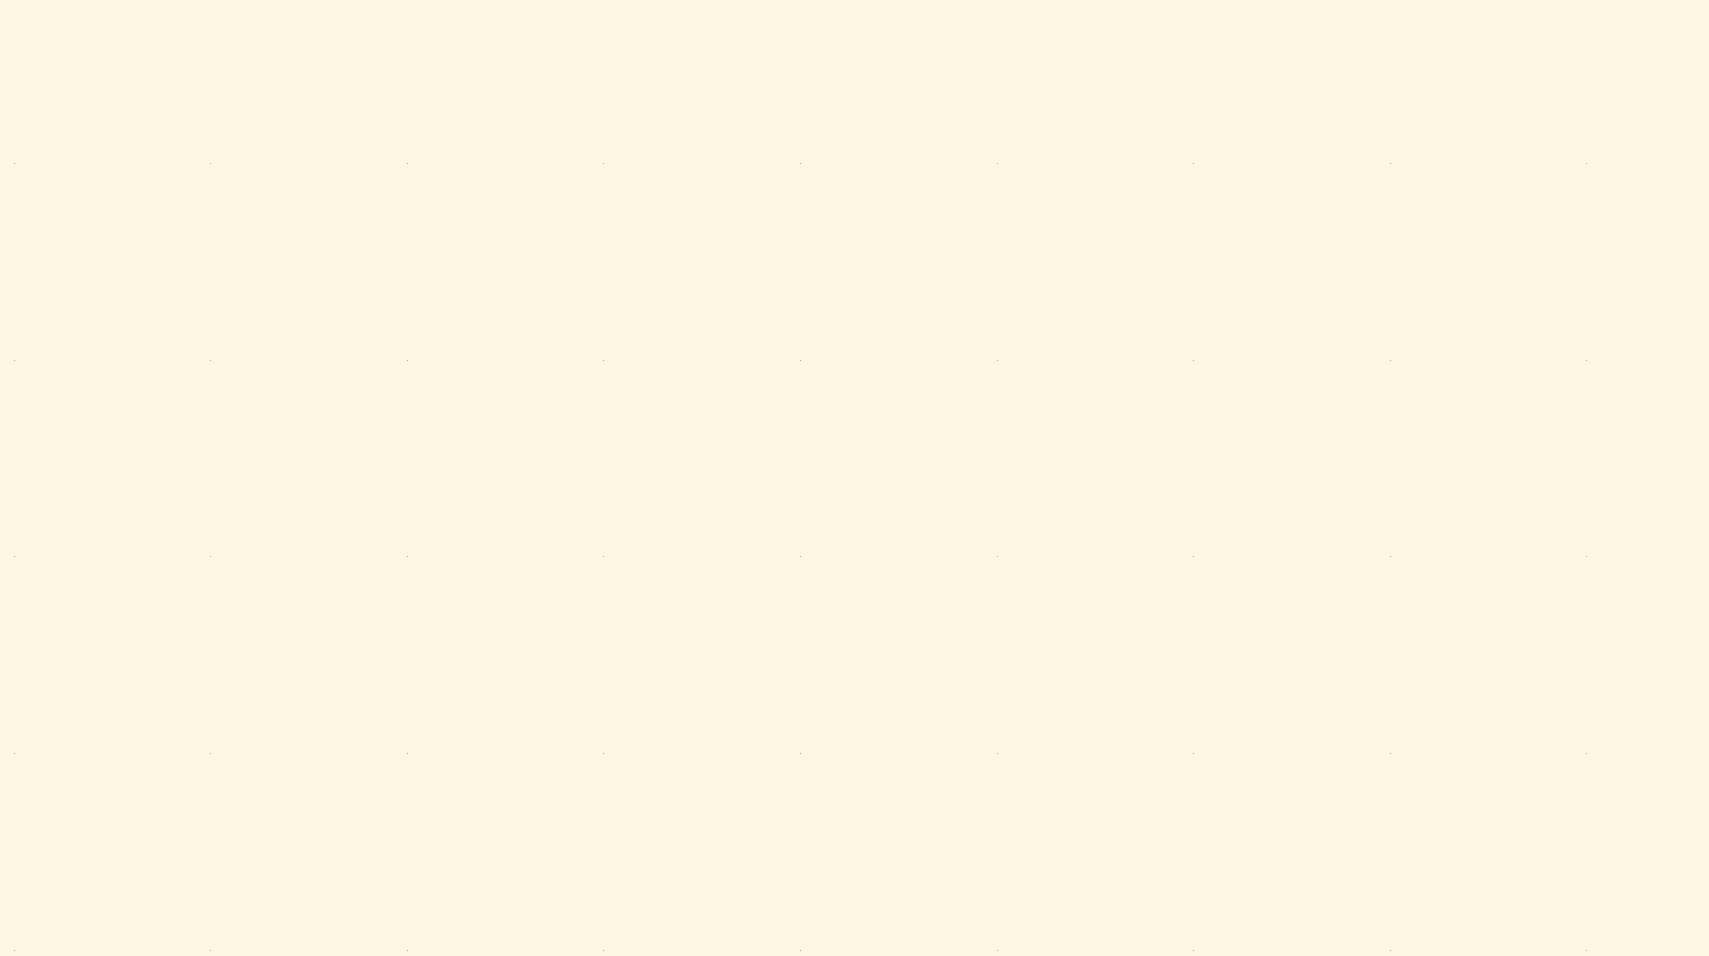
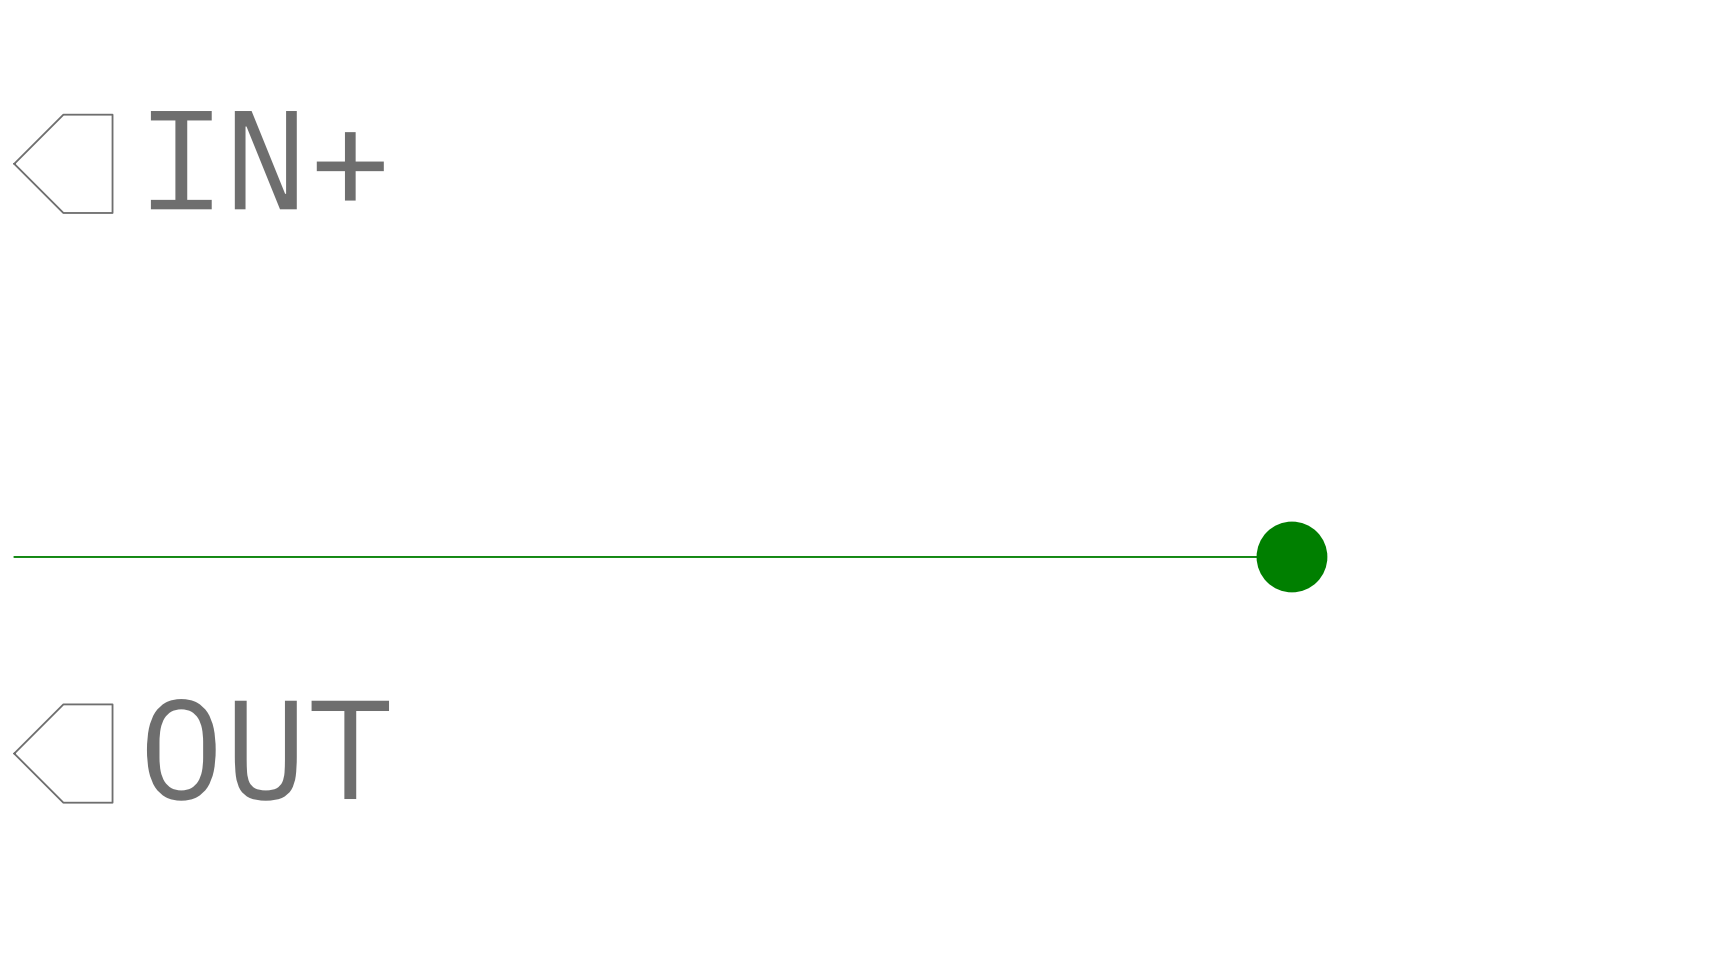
hierarchical label: none -> IN+ (267, 160)
wire: none -> (14, 556) (1291, 556)
junction: none -> (1291, 556)
hierarchical label: none -> OUT (267, 749)

